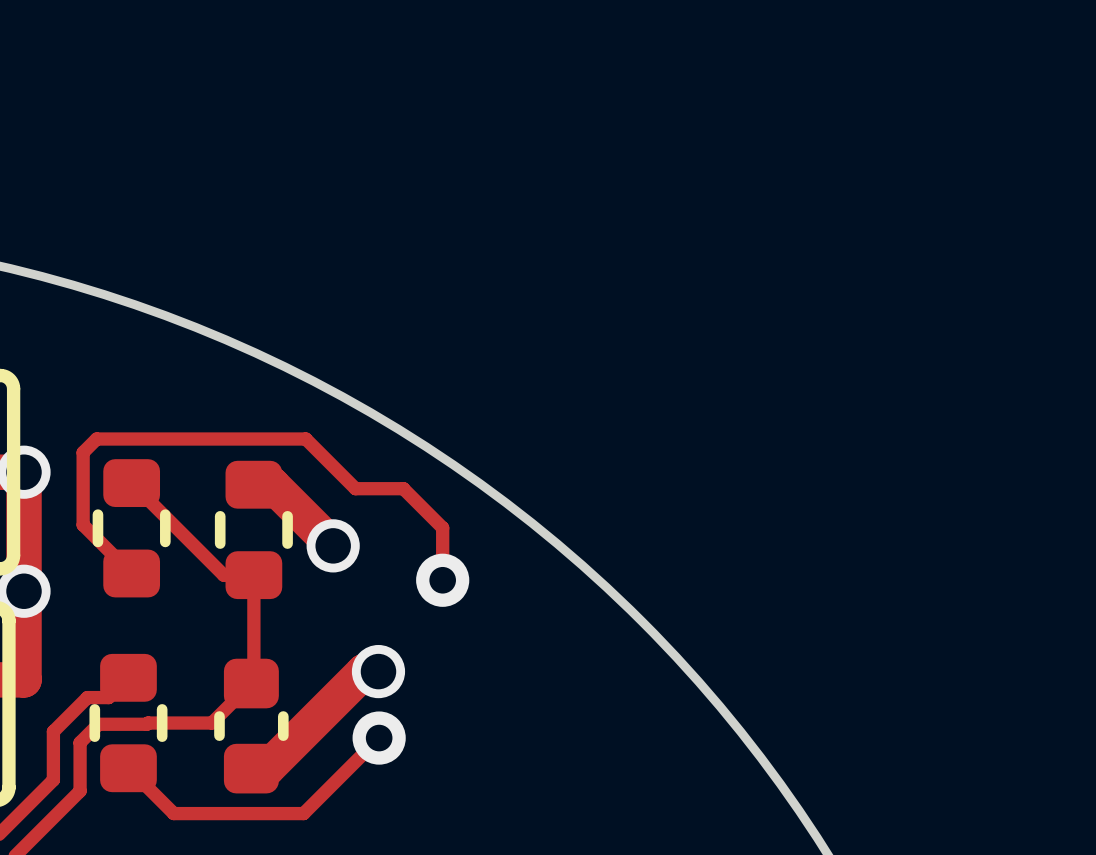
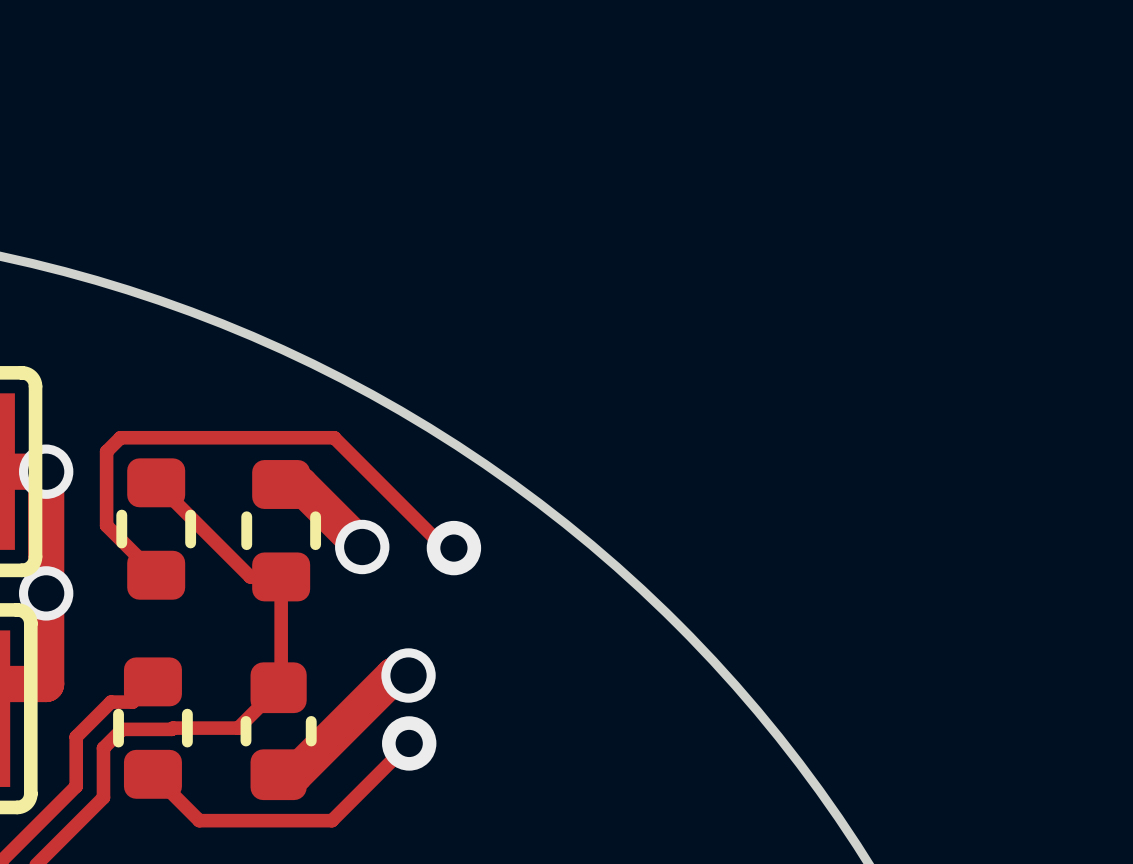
track: (355, 488) (403, 488) (442, 527) (442, 580) -> (385, 488) (444, 548) (453, 548)
via position: (442, 580) -> (453, 548)

